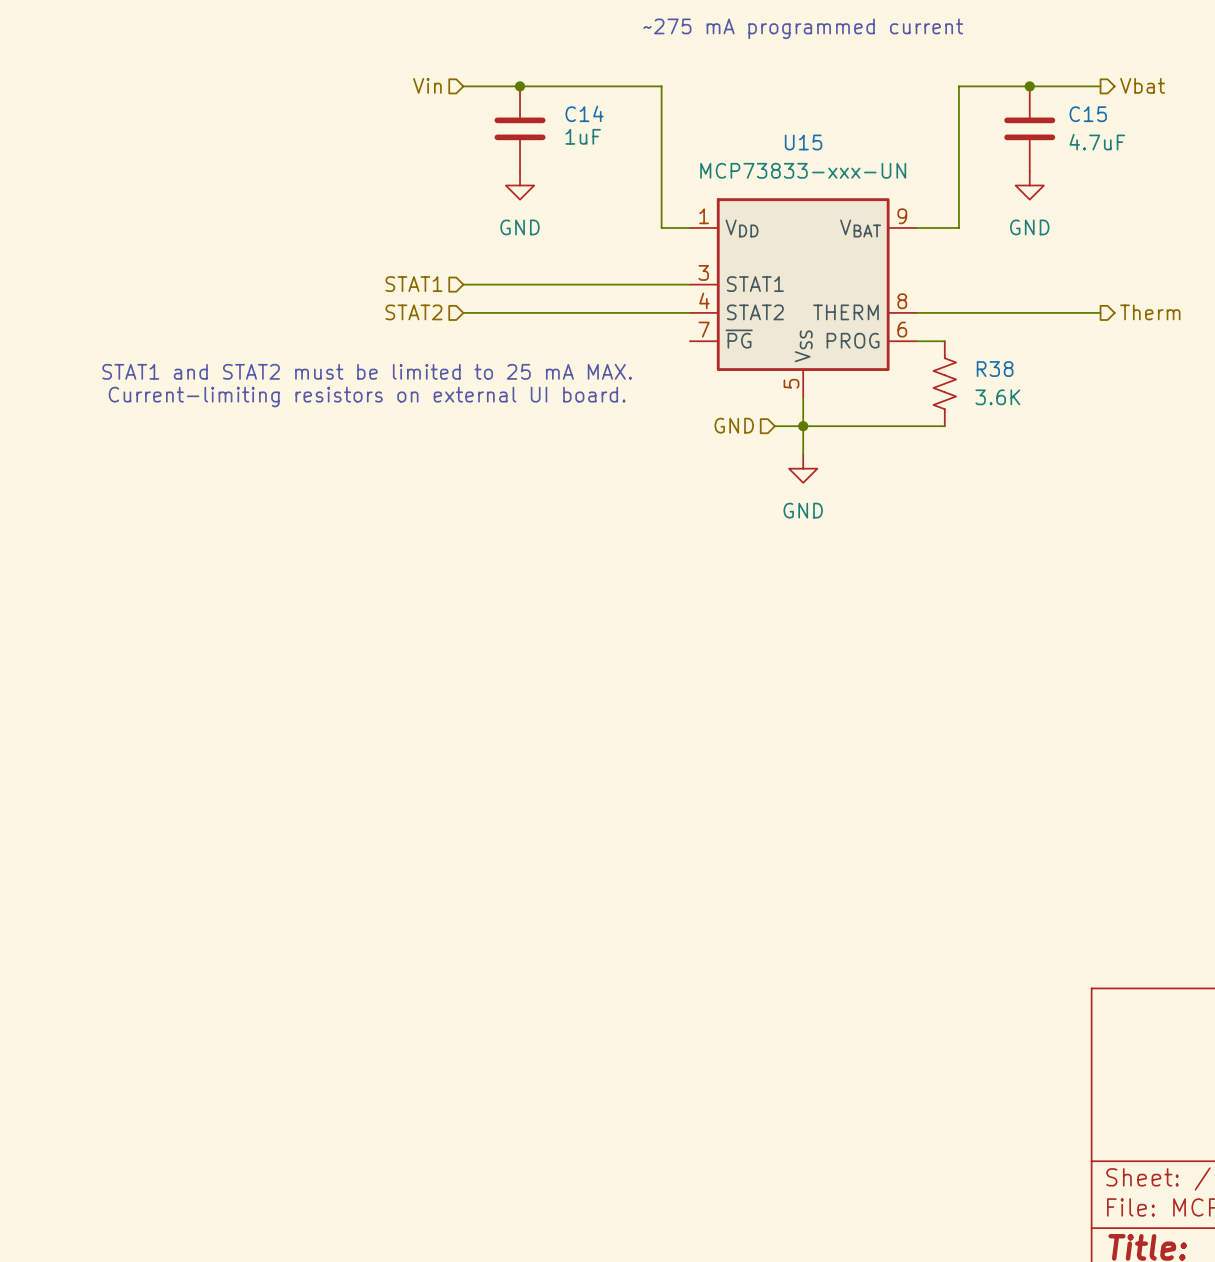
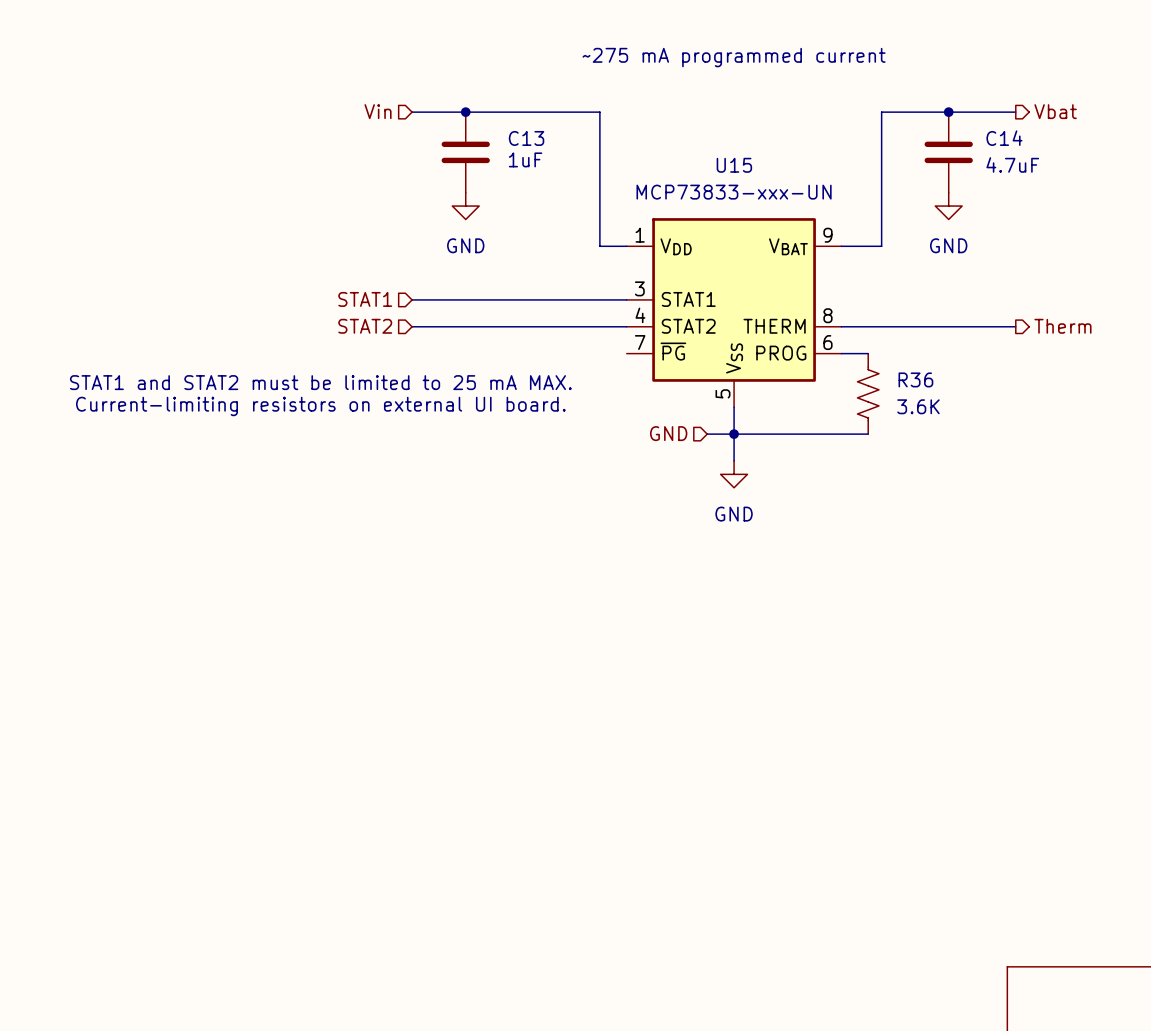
C14 name: C14 (584, 113) -> C13 (526, 138)
C15 name: C15 (1088, 114) -> C14 (1004, 138)
R38 name: R38 (995, 369) -> R36 (915, 379)

